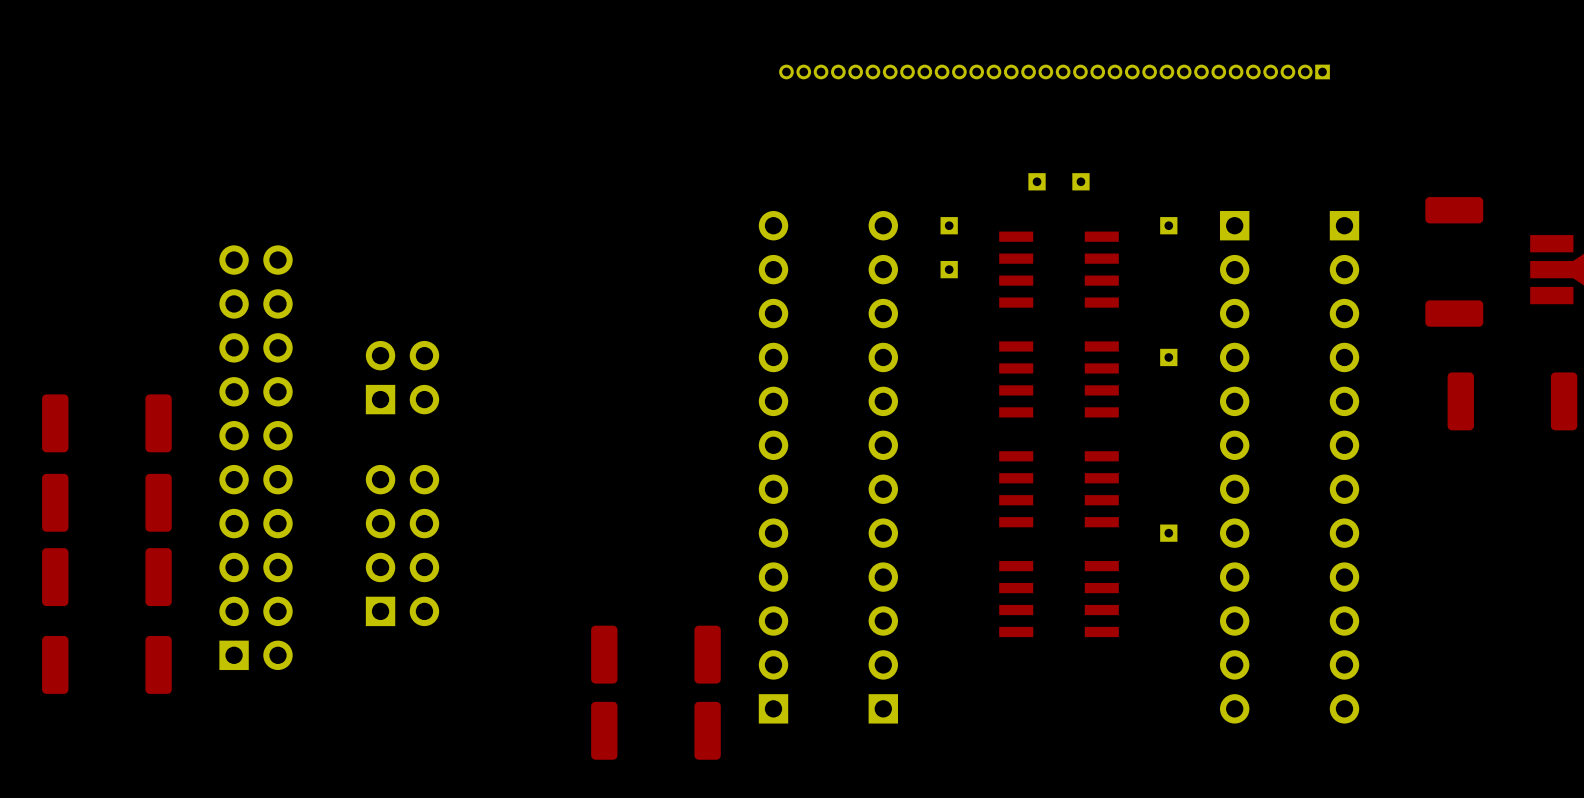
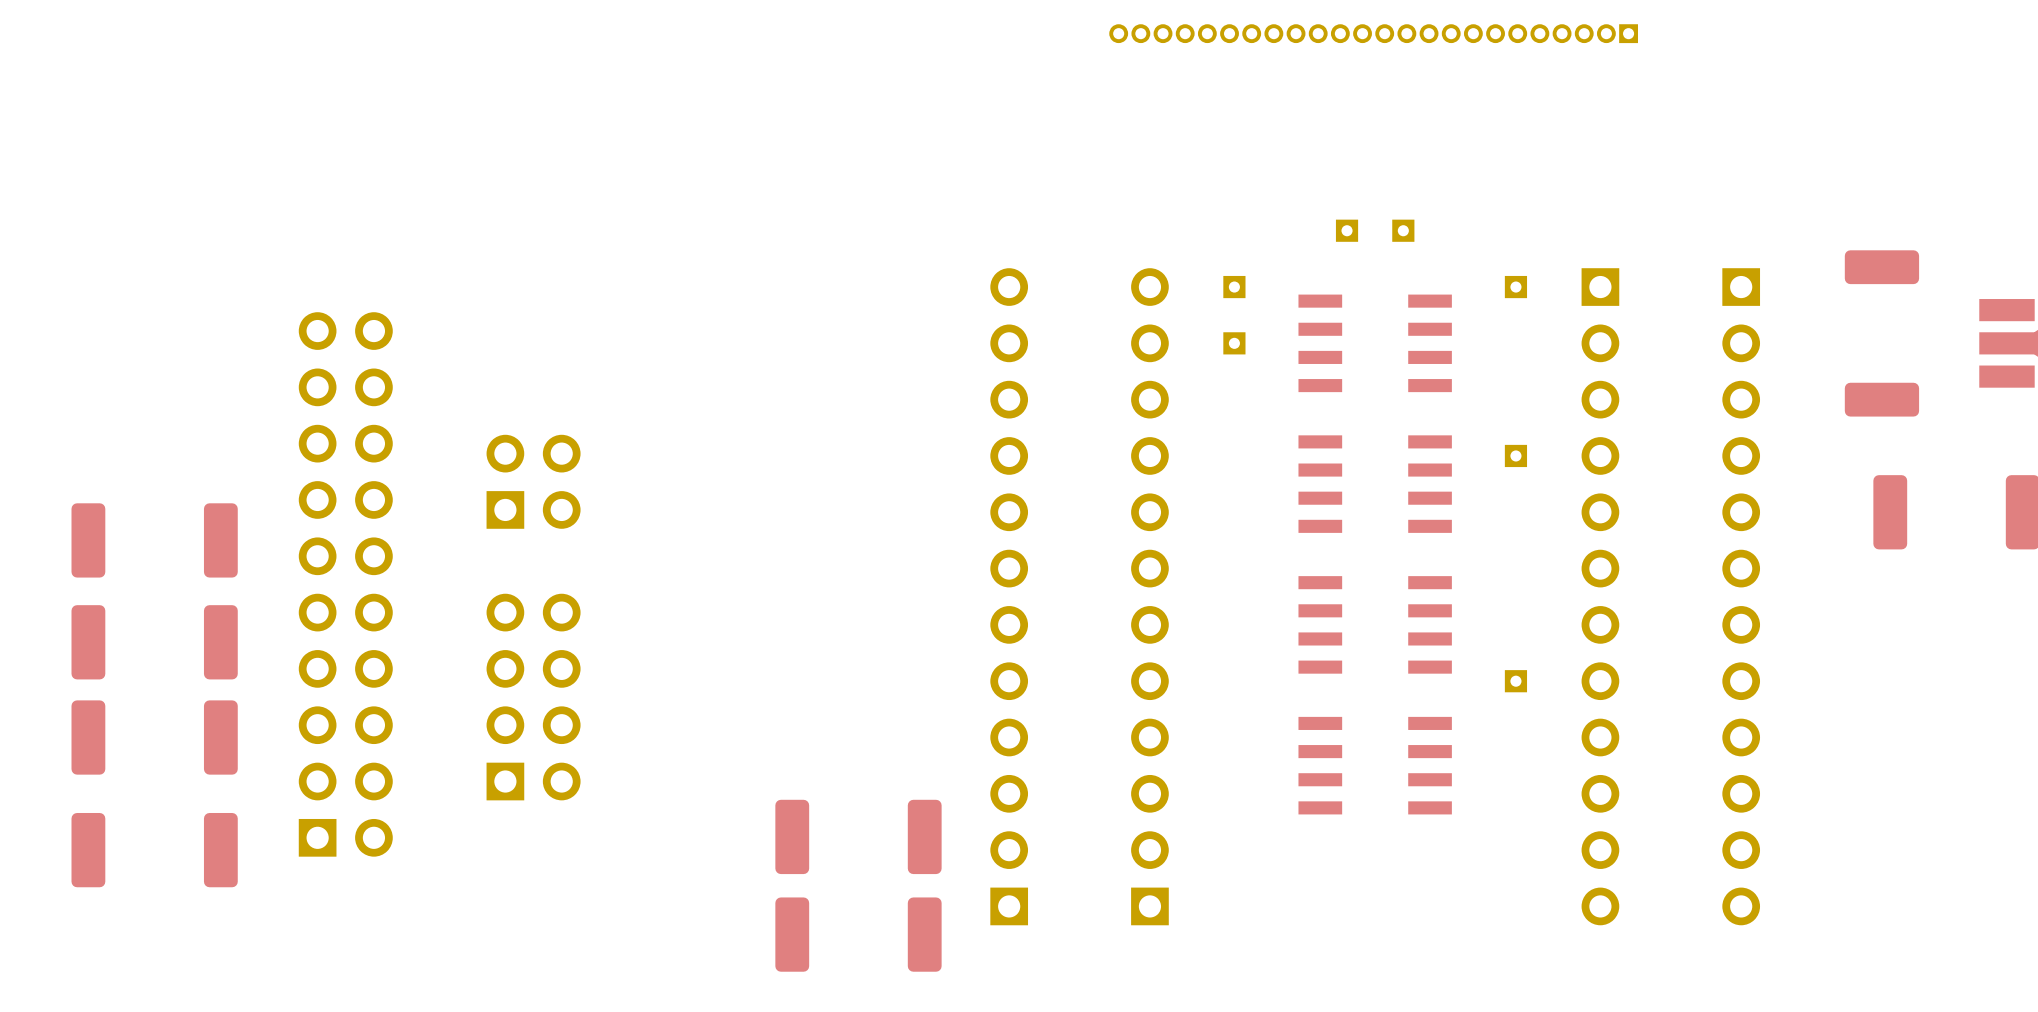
part: none -> (1373, 33)
part: (1054, 71) -> none

